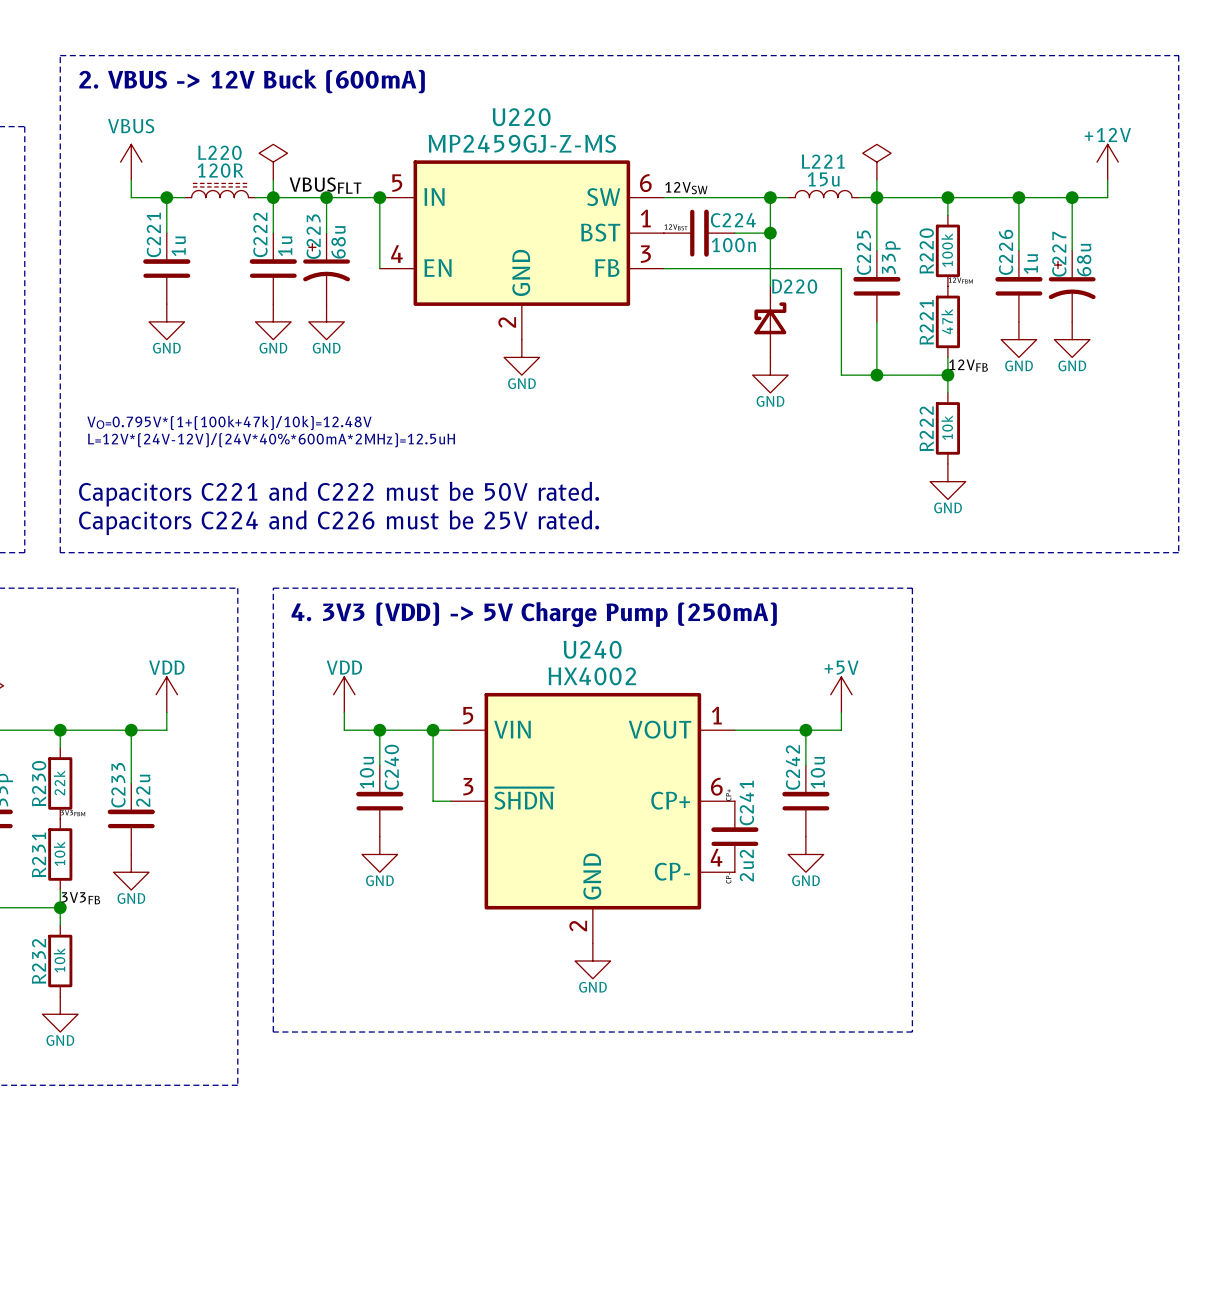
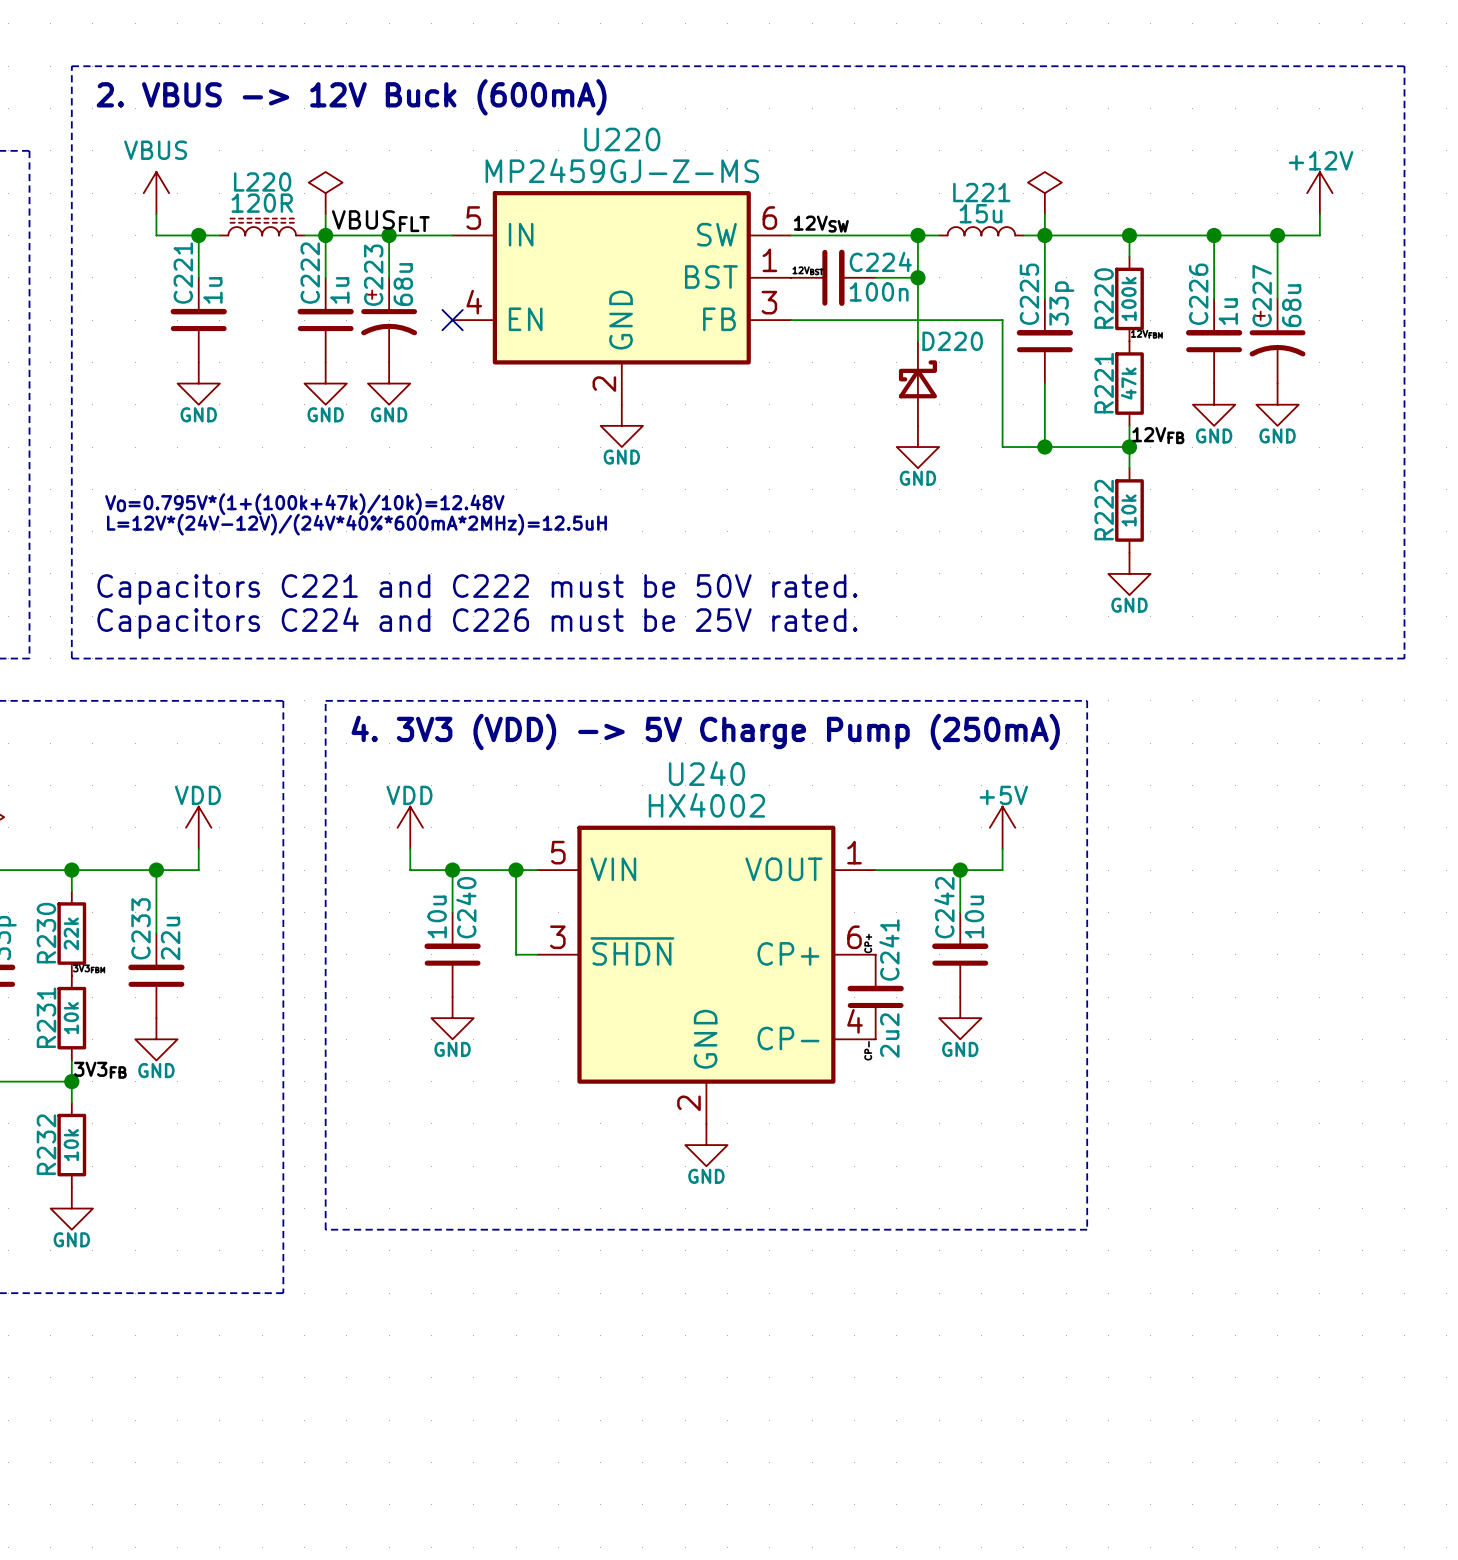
wire: (379, 197) (379, 268) -> none
junction: (379, 197) -> none
no-connect mark: none -> (452, 320)

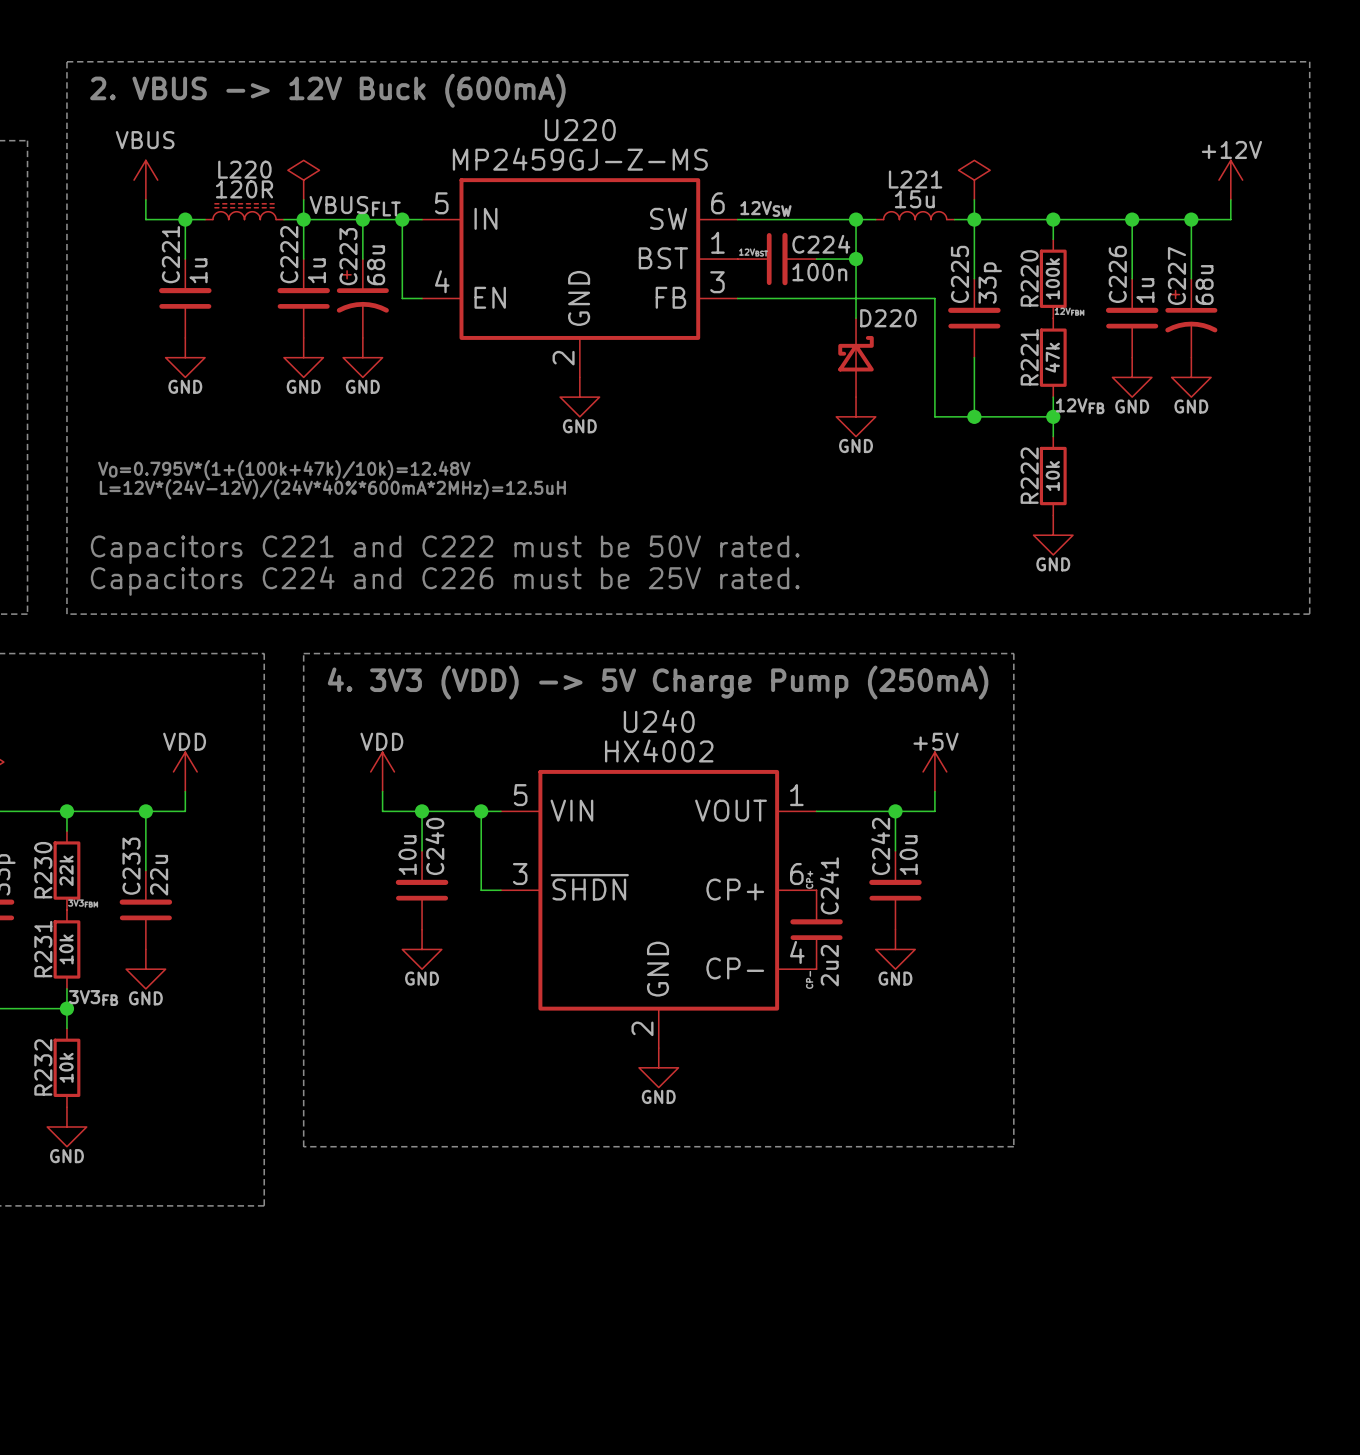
wire: none -> (402, 219) (402, 298) (422, 298)
junction: none -> (402, 219)
no-connect mark: (452, 320) -> none

